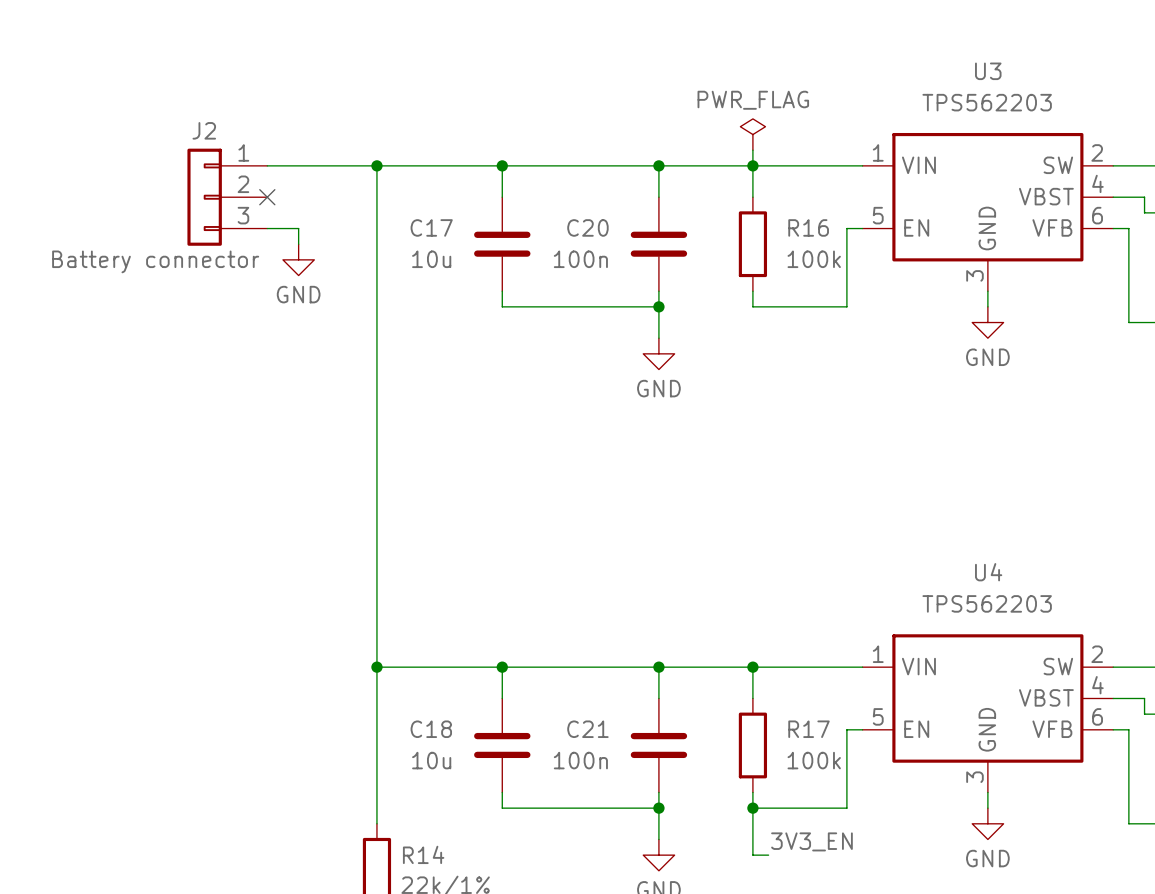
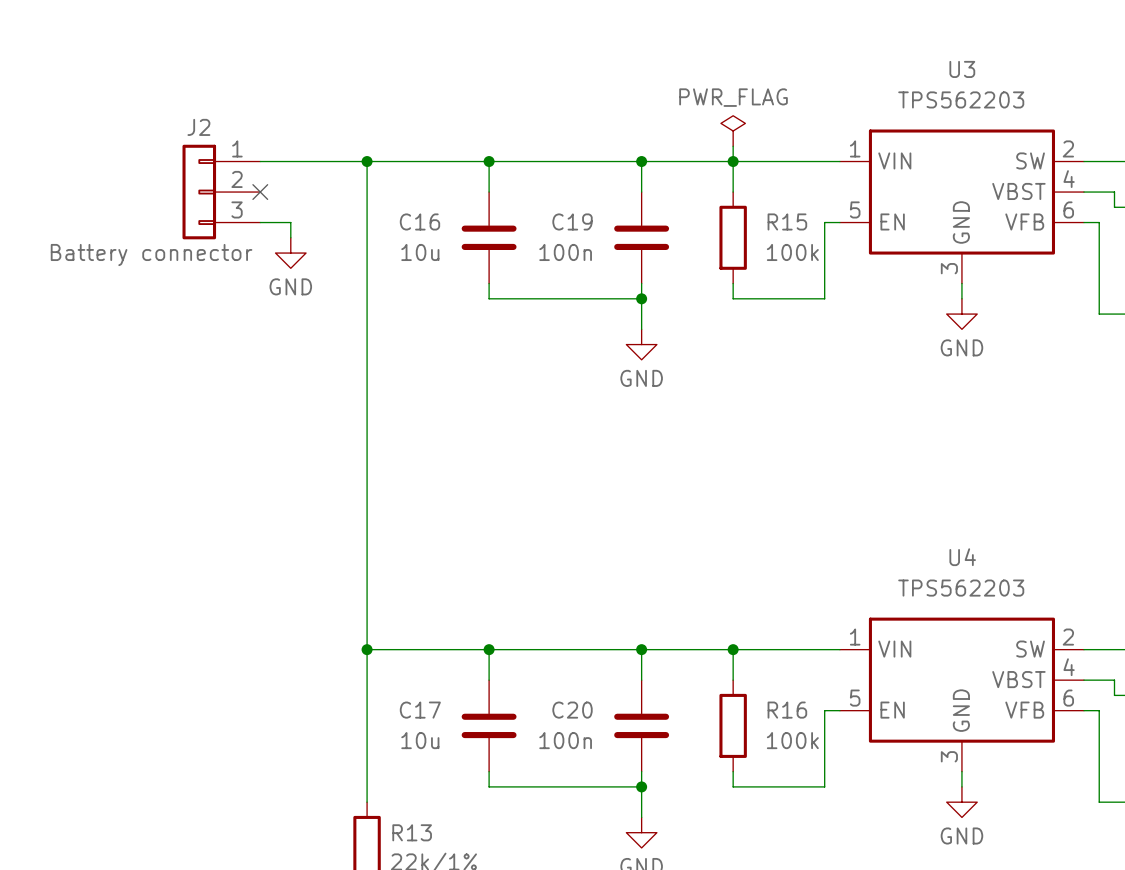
C17 name: C17 (431, 227) -> C16 (419, 221)
C20 name: C20 (587, 227) -> C19 (572, 221)
R16 name: R16 (808, 227) -> R15 (787, 221)
C18 name: C18 (431, 729) -> C17 (420, 710)
C21 name: C21 (587, 729) -> C20 (572, 710)
R17 name: R17 (808, 729) -> R16 (787, 710)
wire: (752, 808) (752, 855) (768, 855) -> none
junction: (752, 808) -> none
label: 3V3_EN (811, 841) -> none
R14 name: R14 (423, 854) -> R13 (412, 832)

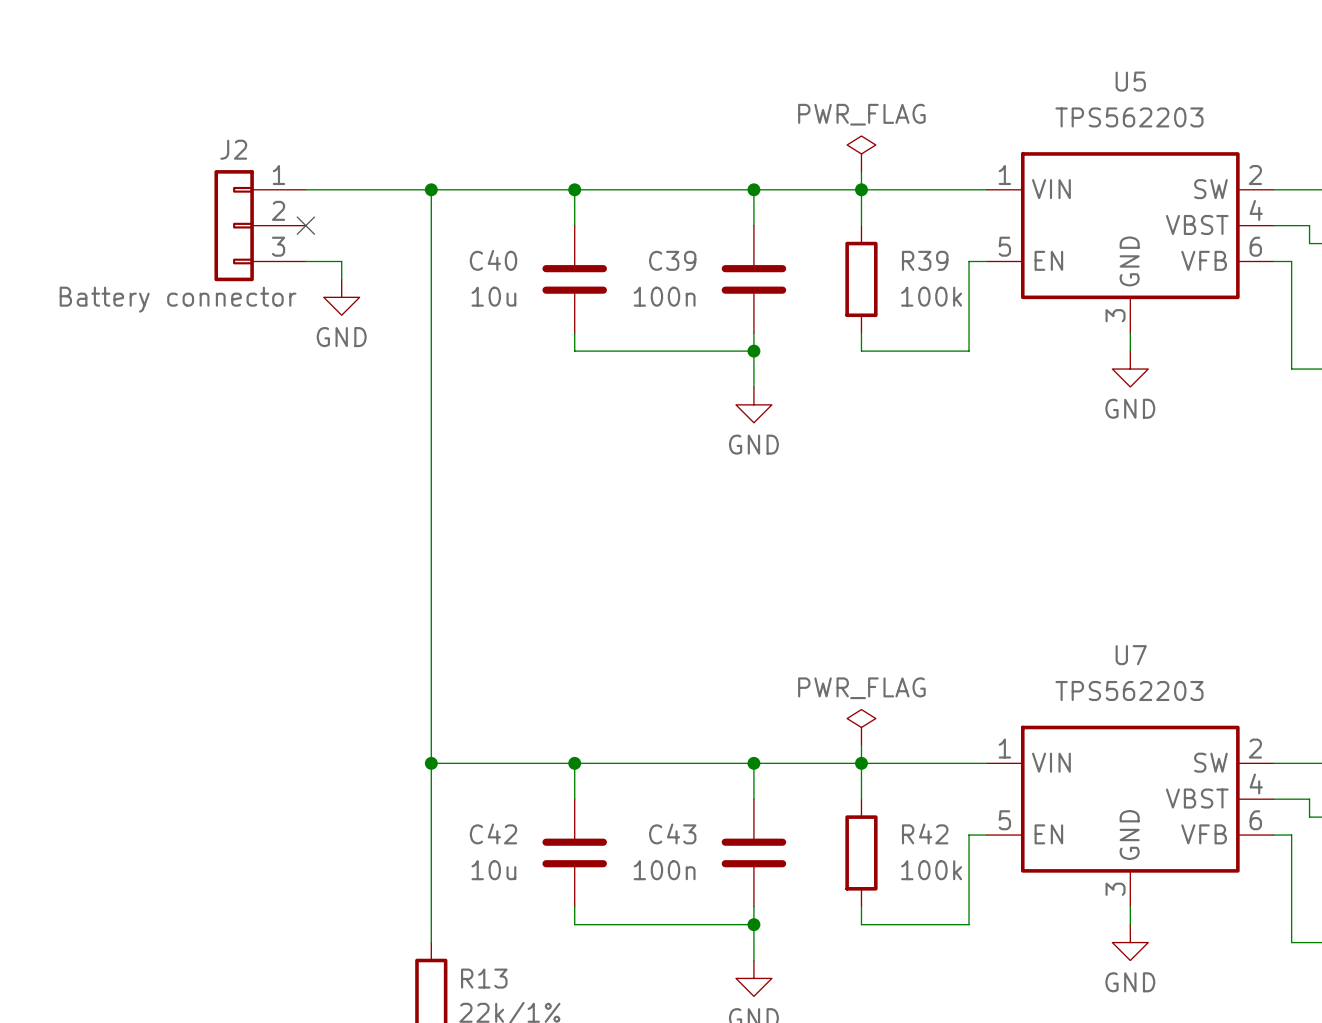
U3 name: U3 (962, 69) -> U5 (1130, 81)
C16 name: C16 (419, 221) -> C40 (493, 260)
C19 name: C19 (572, 221) -> C39 (672, 260)
R15 name: R15 (787, 221) -> R39 (925, 260)
U4 name: U4 (962, 557) -> U7 (1131, 655)
power symbol: none -> PWR_FLAG (861, 727)
wire: none -> (861, 745) (861, 763)
C17 name: C17 (420, 710) -> C42 (493, 833)
C20 name: C20 (572, 710) -> C43 (672, 833)
R16 name: R16 (787, 710) -> R42 (925, 833)

